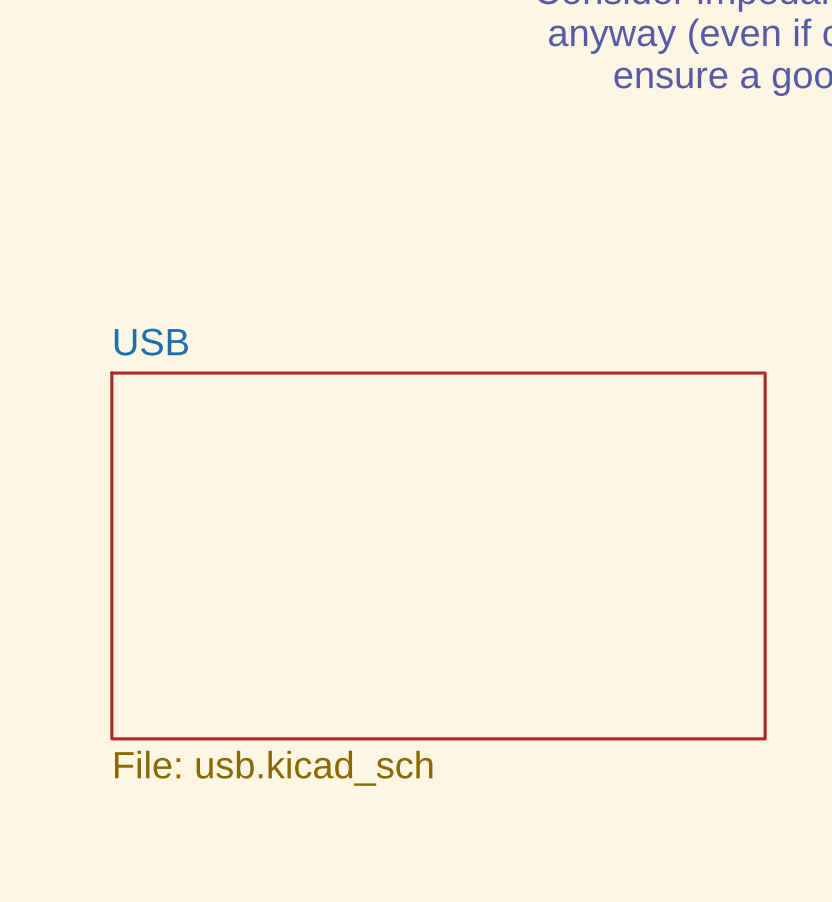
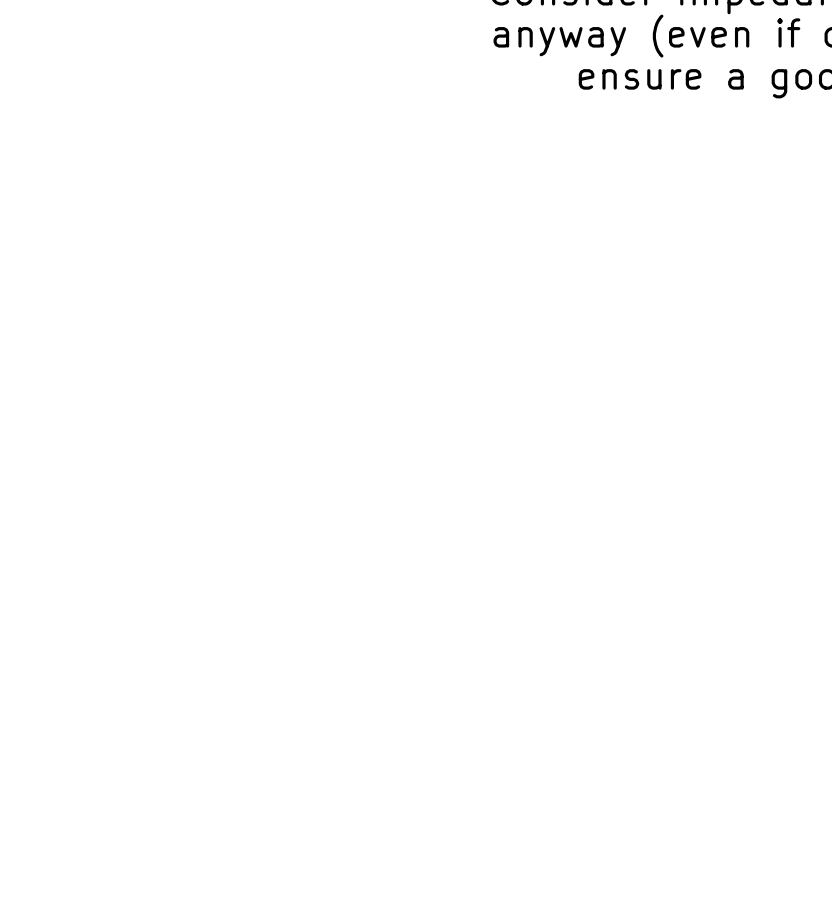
sheet USB: File: usb.kicad_sch (438, 555) -> none

